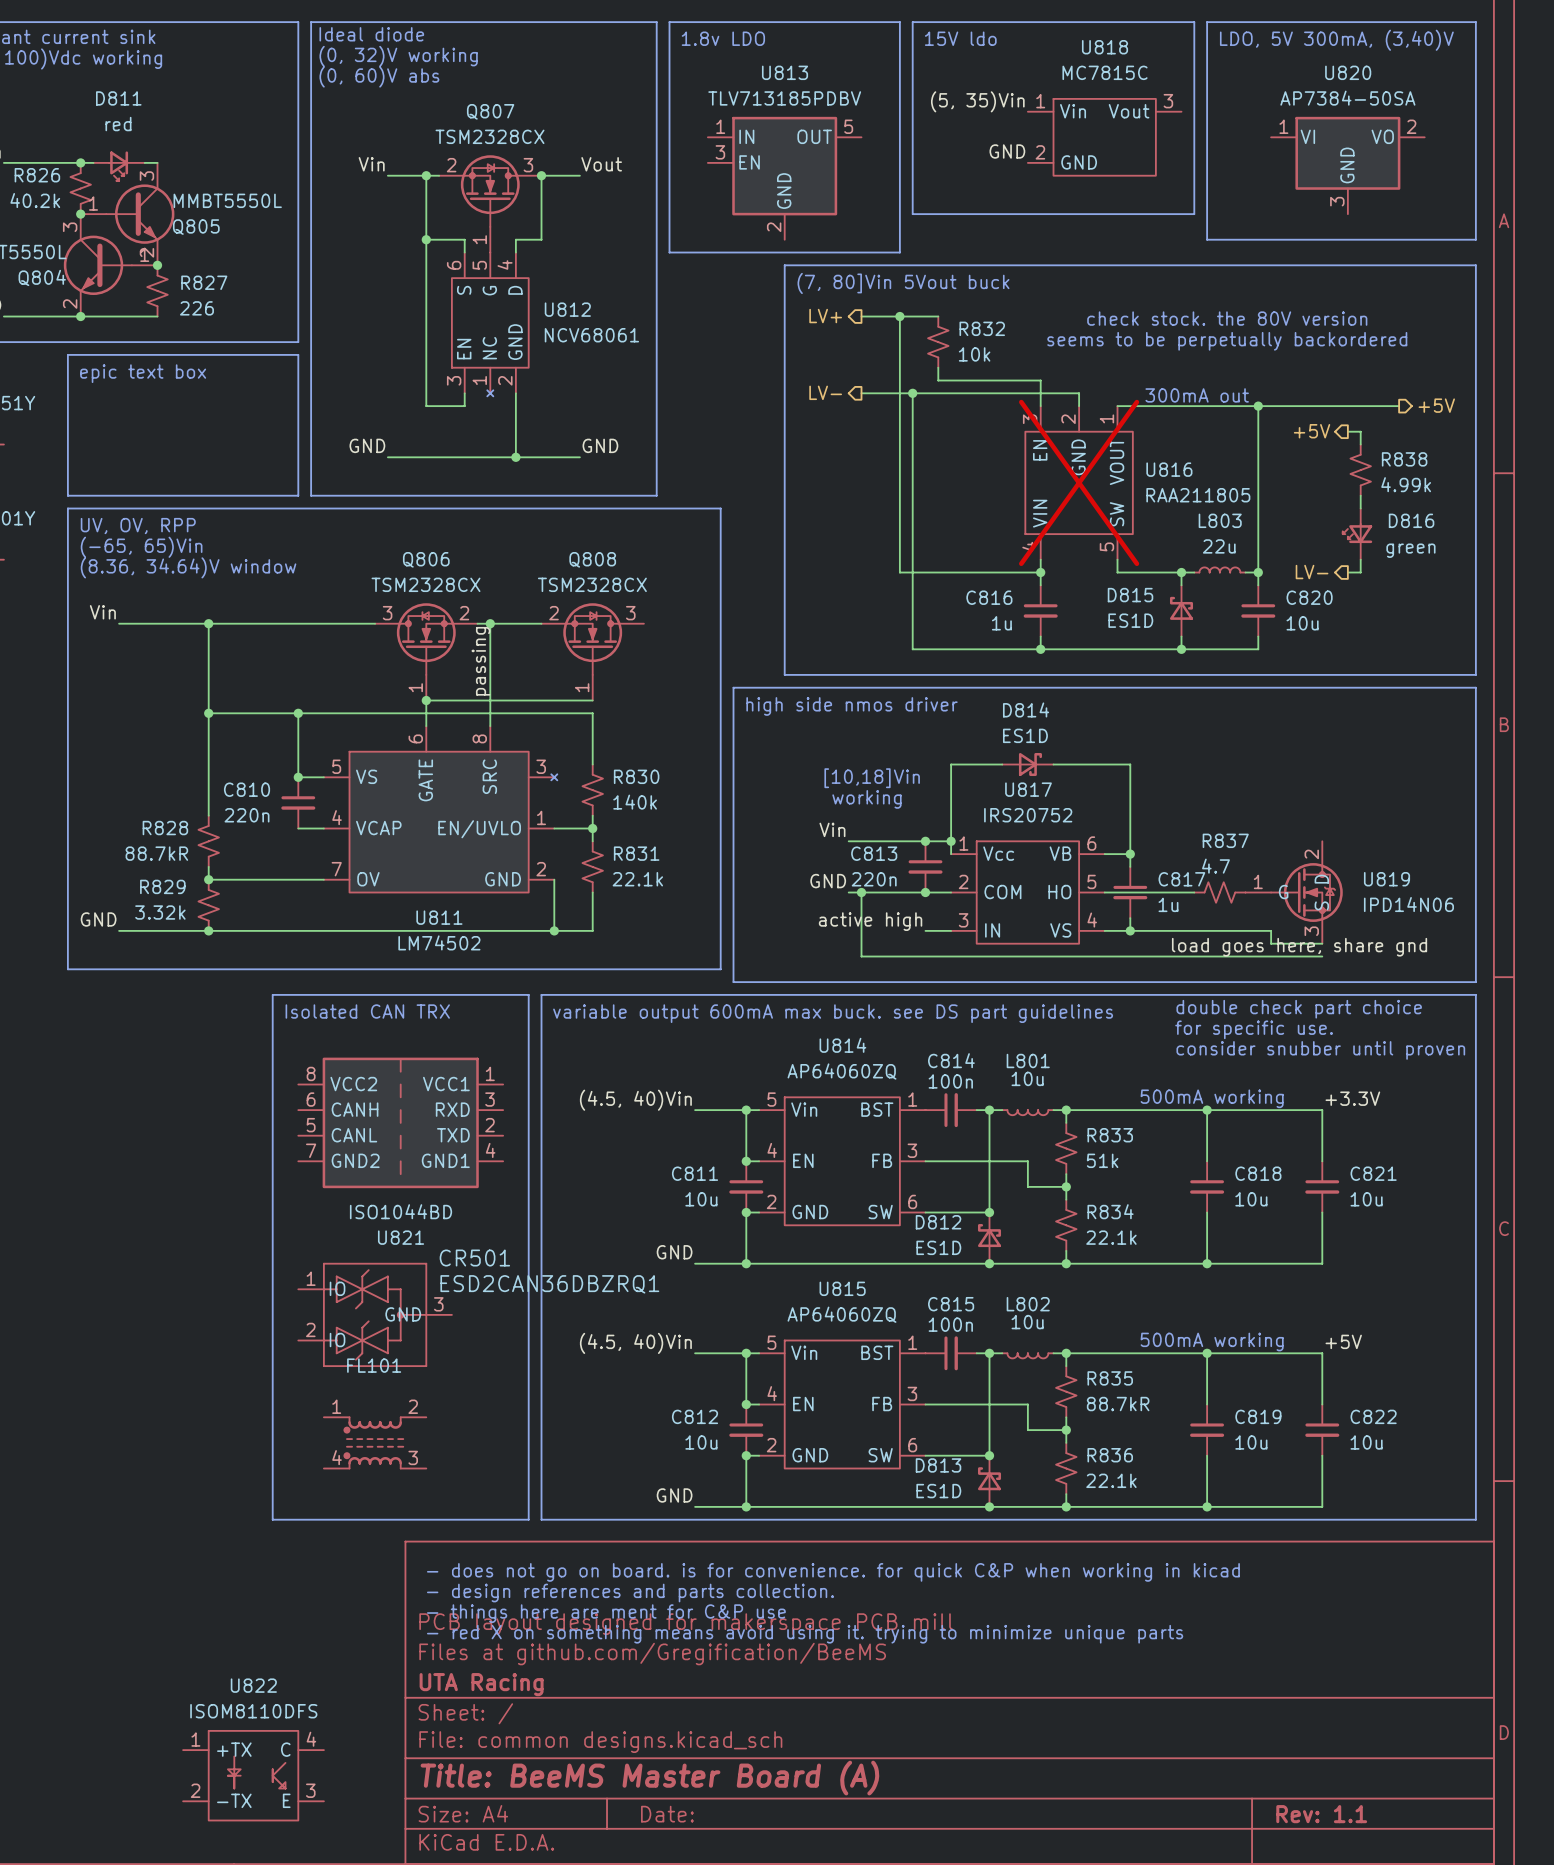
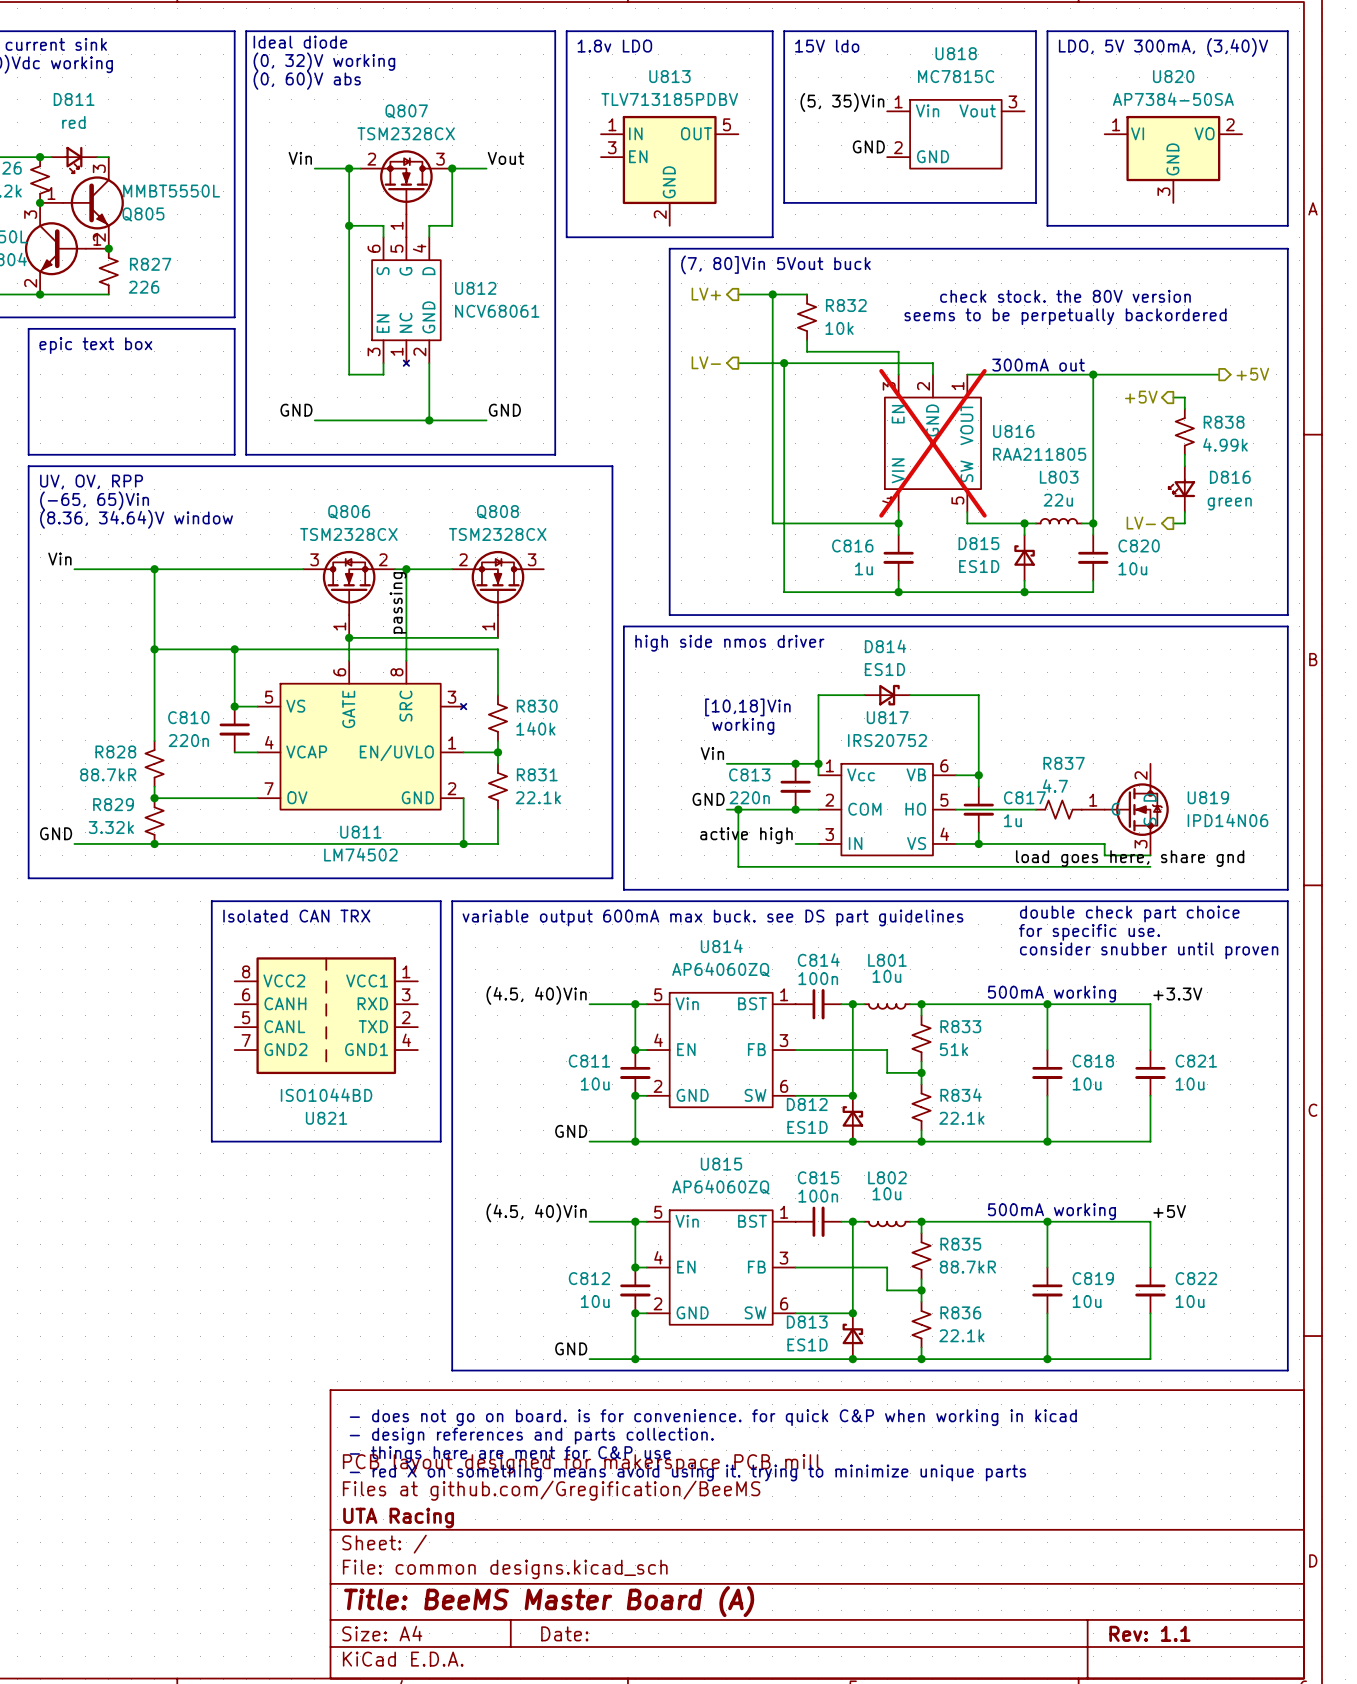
line: (272, 1263) (272, 1519) (528, 1519) (528, 1263) -> (211, 1141) (440, 1141)
CR501: ESD2CAN36DBZRQ1 (375, 1314) -> none
FL101: (375, 1442) -> none
U822: ISOM8110DFS (253, 1775) -> none

